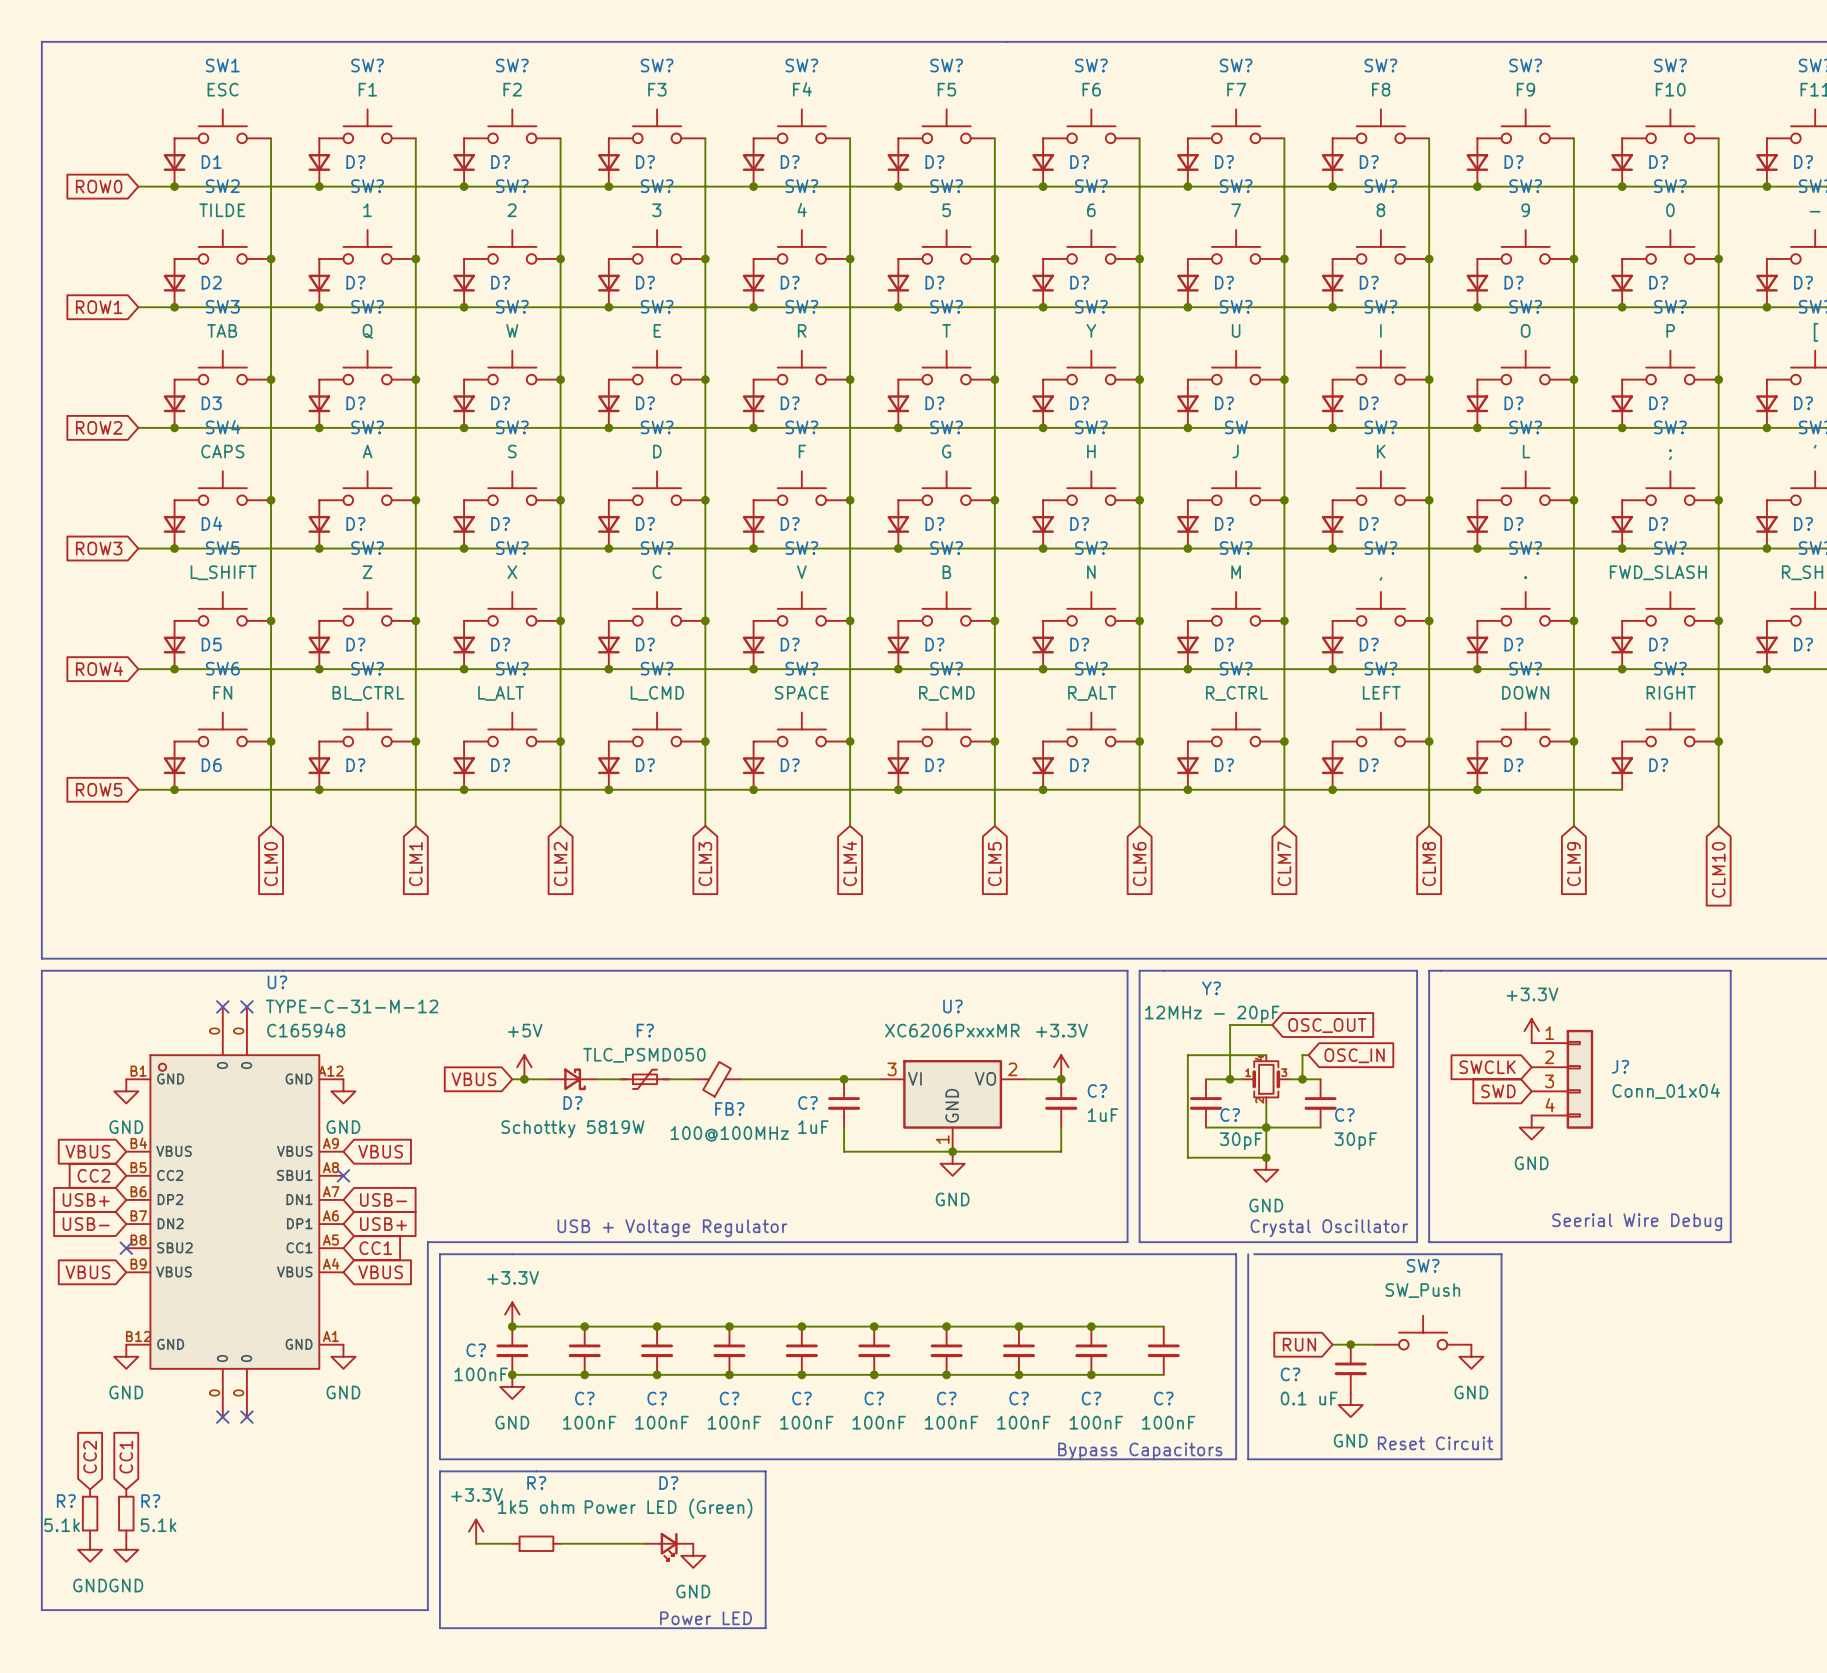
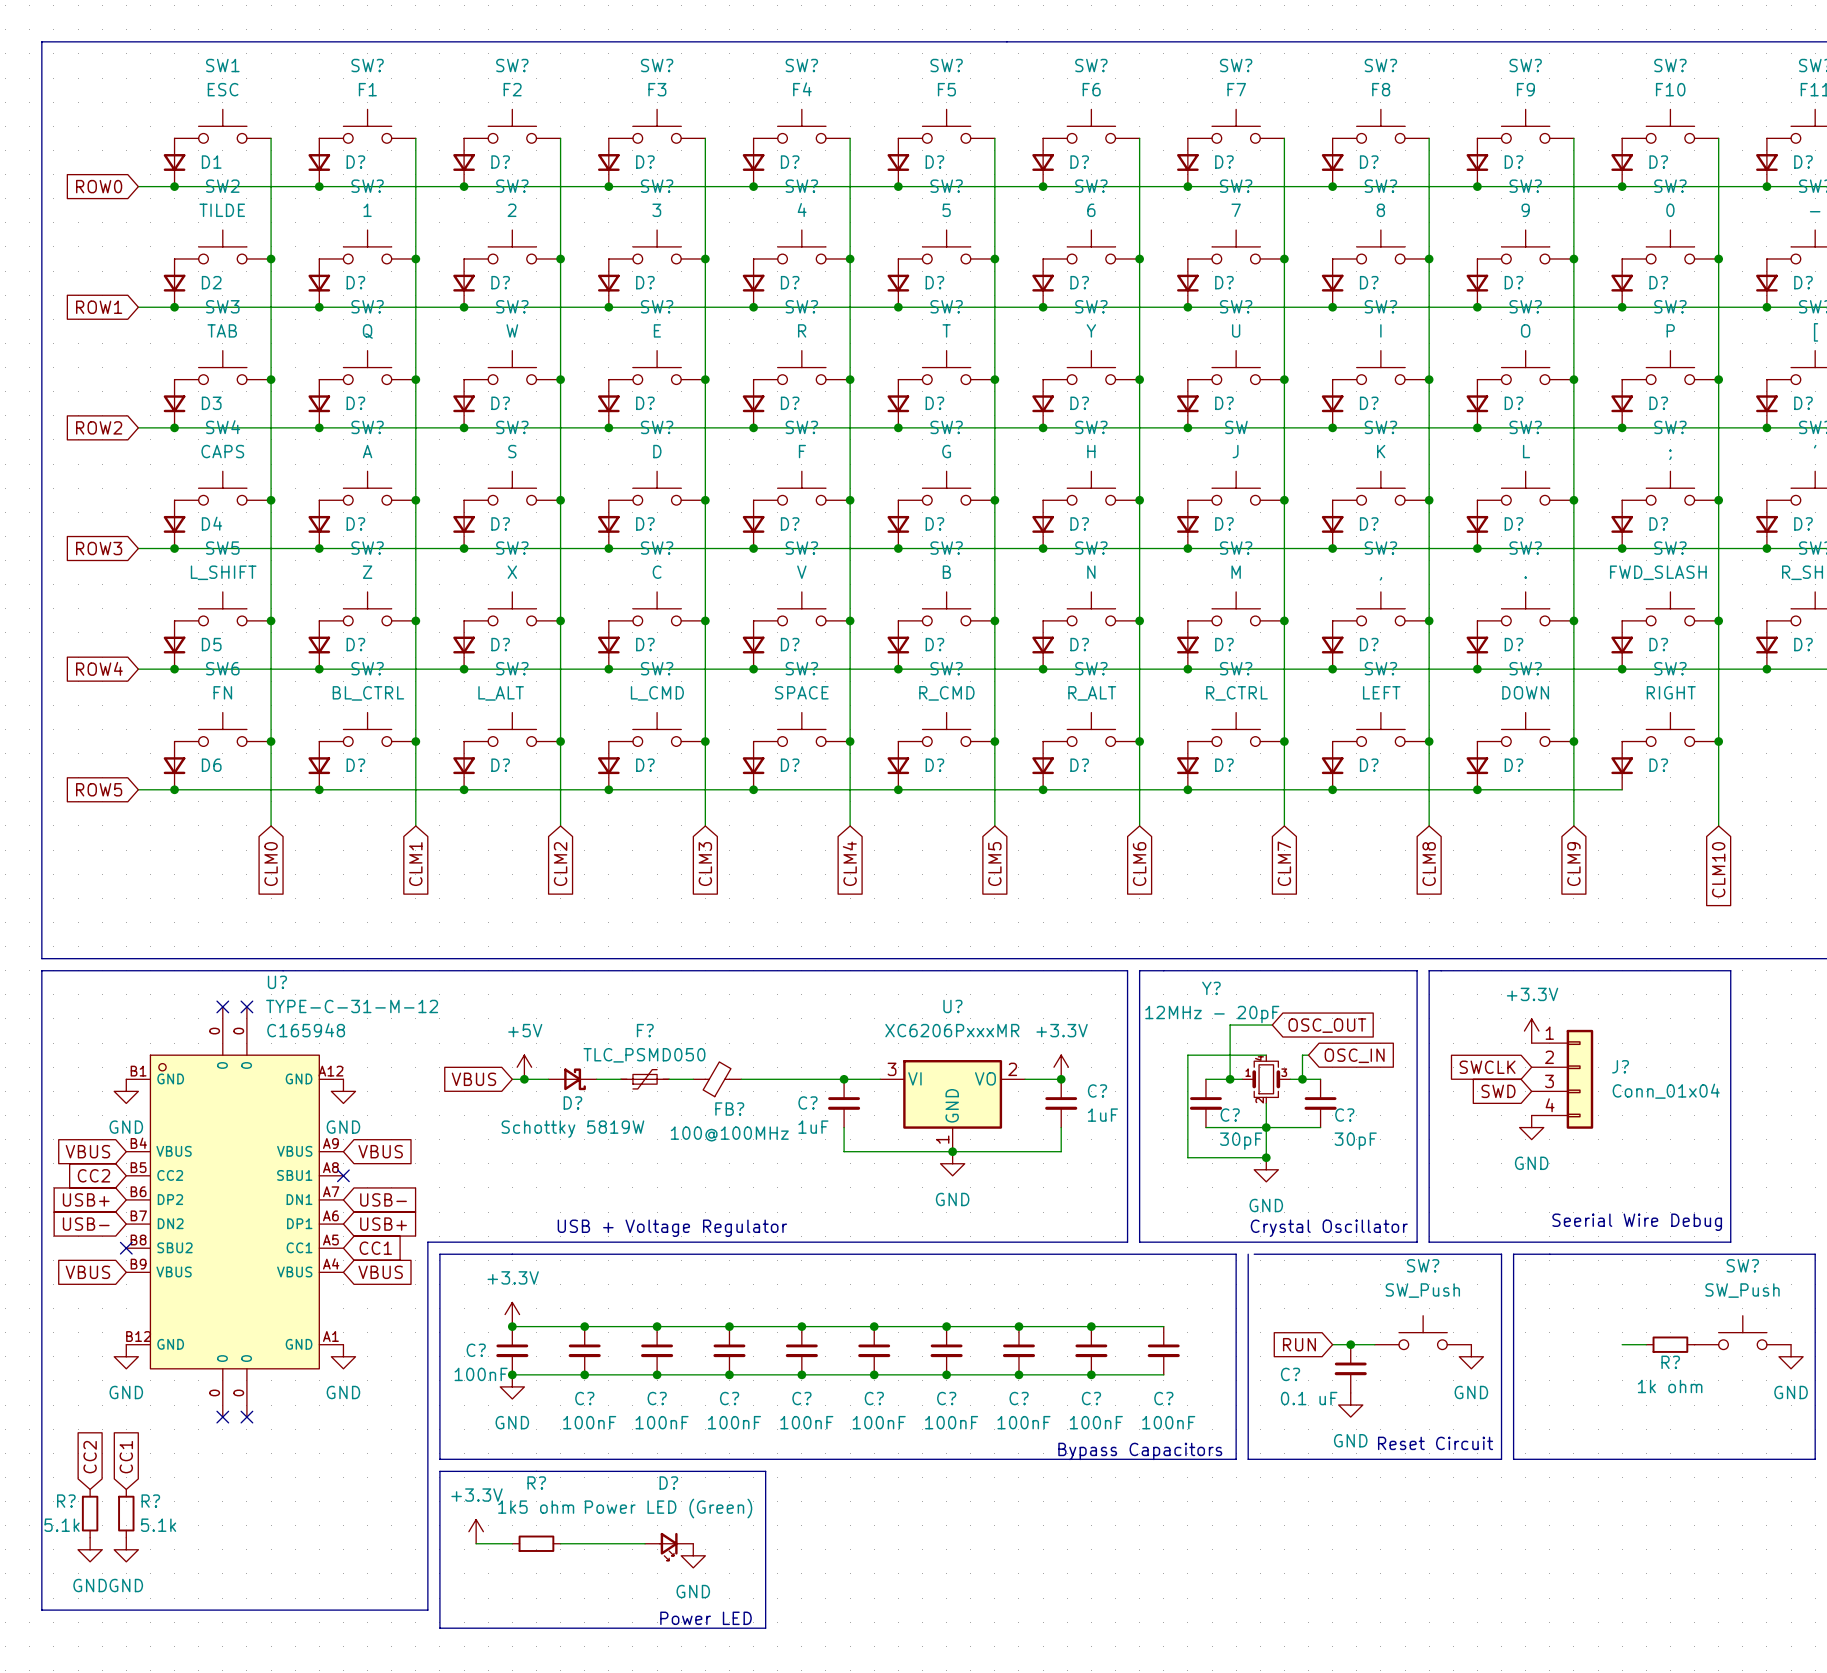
line: none -> (1513, 1254) (1815, 1254) (1815, 1459) (1513, 1459) (1513, 1254)
SW?: none -> SW_Push (1742, 1332)
wire: none -> (1622, 1344) (1646, 1344)
R?: none -> 1k ohm (1670, 1344)
power symbol: none -> GND (1791, 1356)

